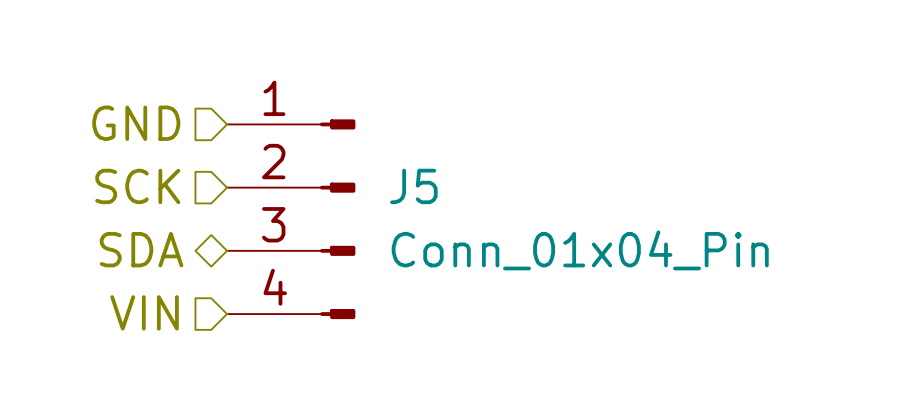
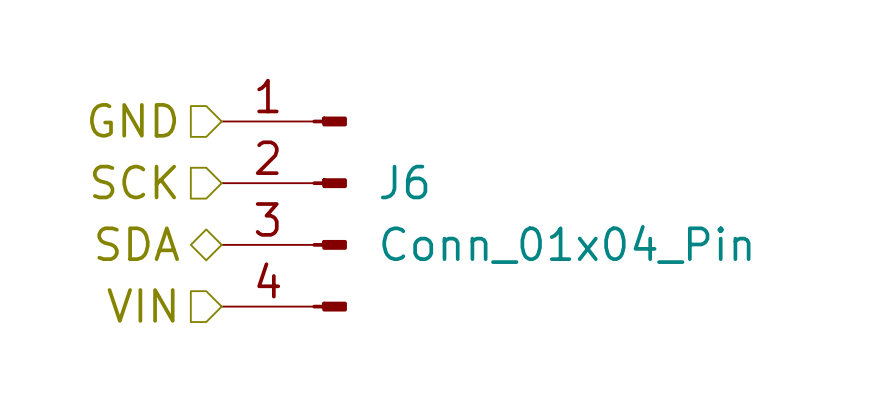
J5 name: J5 (413, 186) -> J6 (404, 182)

